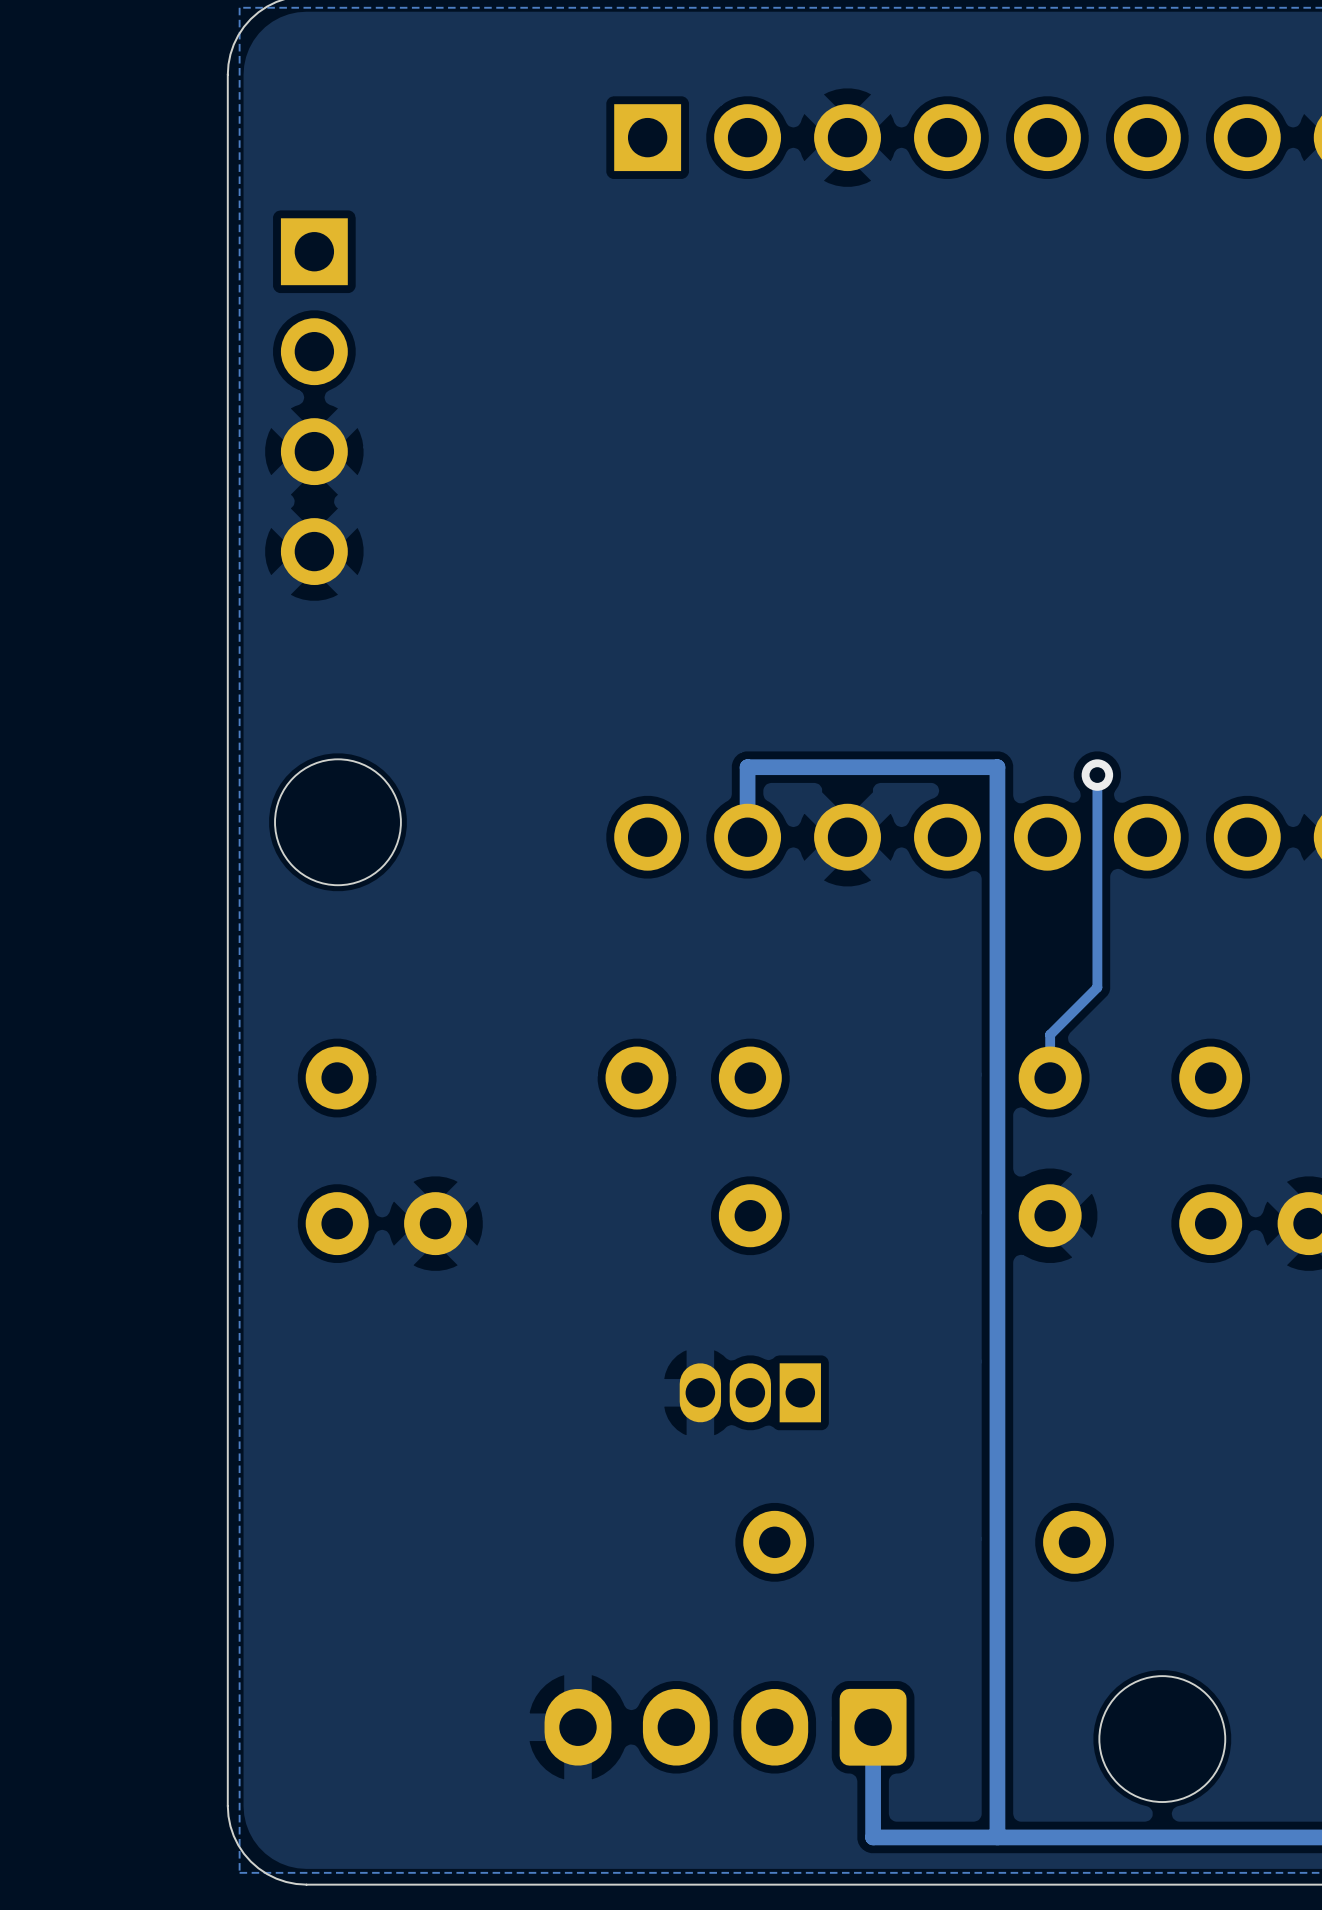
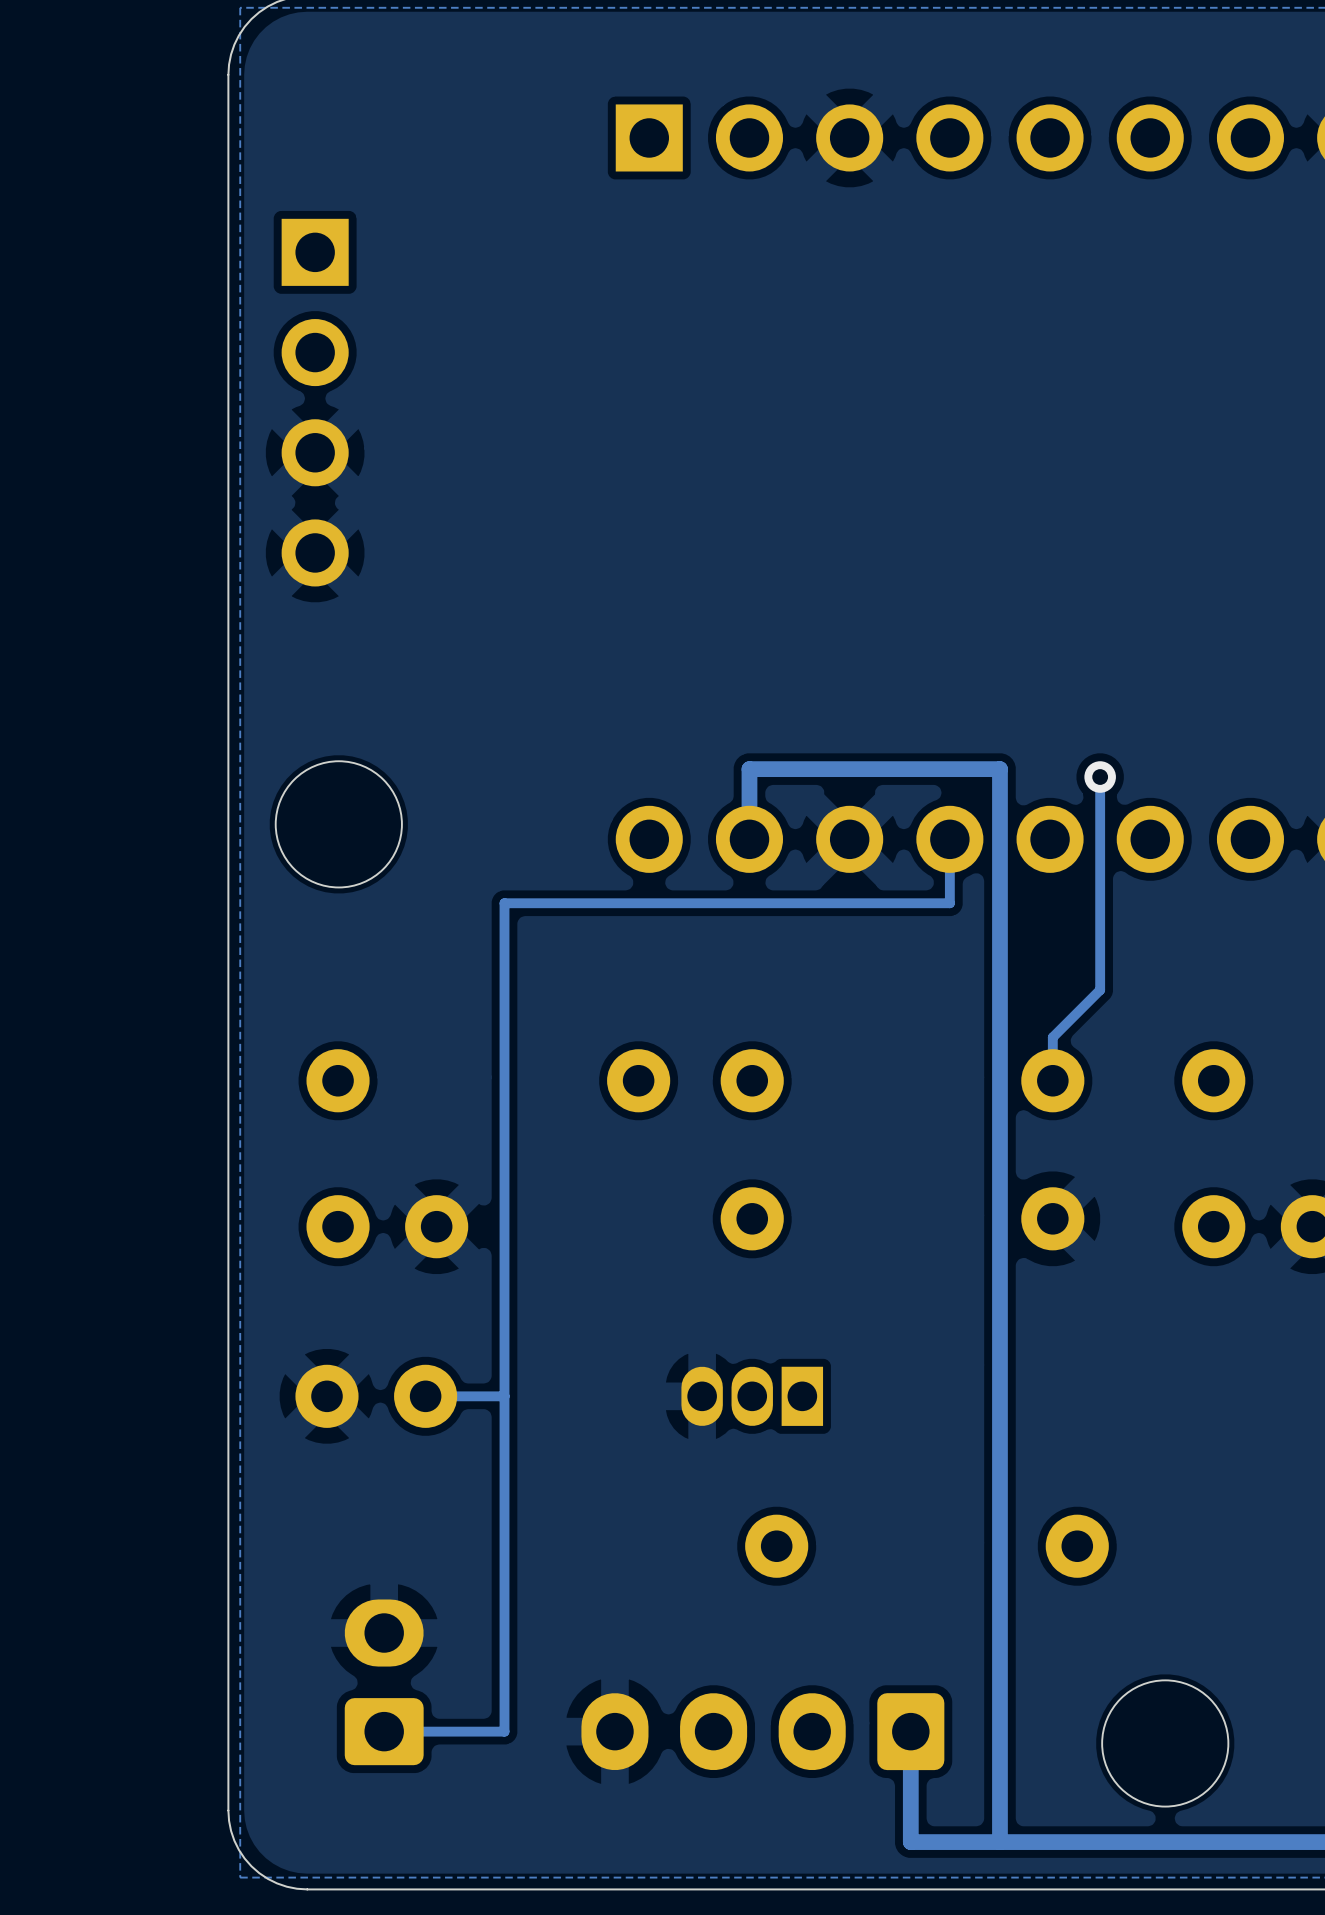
track: none -> (949, 839) (949, 903) (504, 903) (504, 1731) (384, 1731)
part: none -> (376, 1396)
track: none -> (504, 1396) (425, 1396)
part: none -> (384, 1682)
part position: (725, 1727) -> (762, 1731)
track: (873, 1727) (873, 1837) (908, 1837) -> (910, 1731) (910, 1842)

